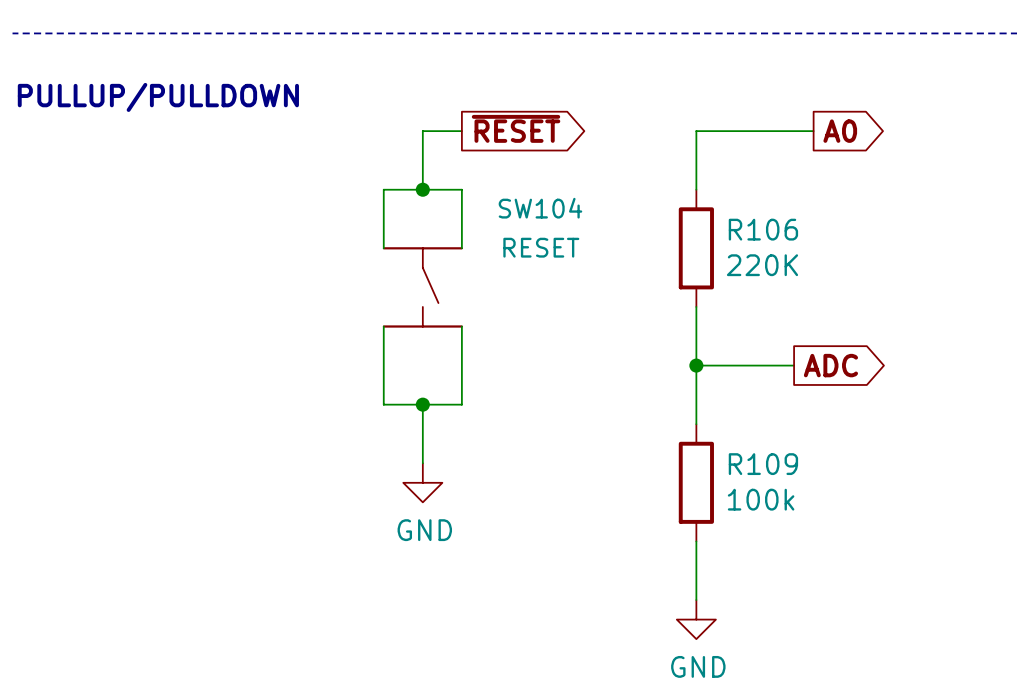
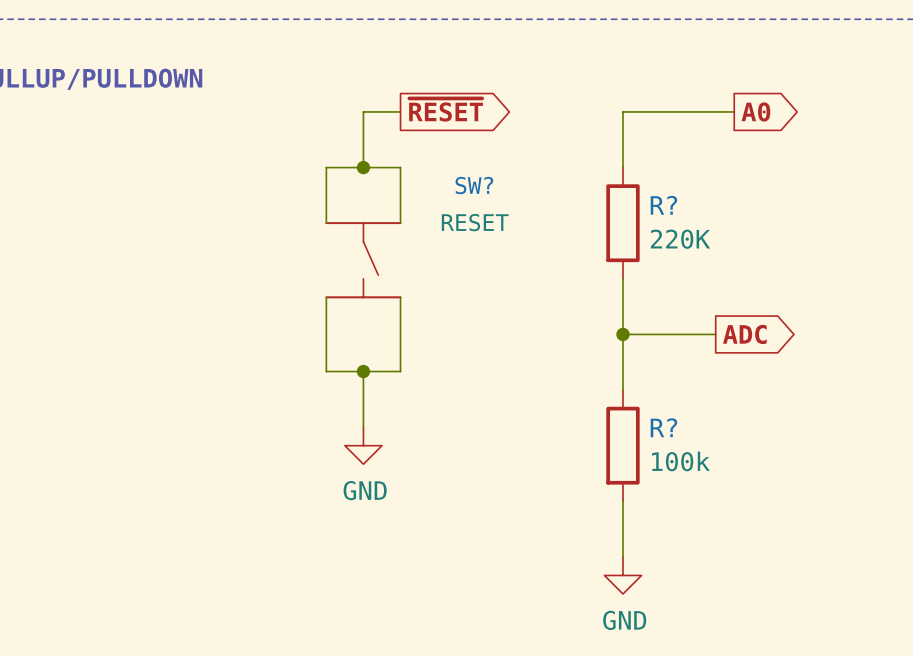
SW104 name: SW104 (540, 208) -> SW? (474, 185)
R106 name: R106 (763, 229) -> R? (663, 205)
R109 name: R109 (763, 464) -> R? (663, 427)

